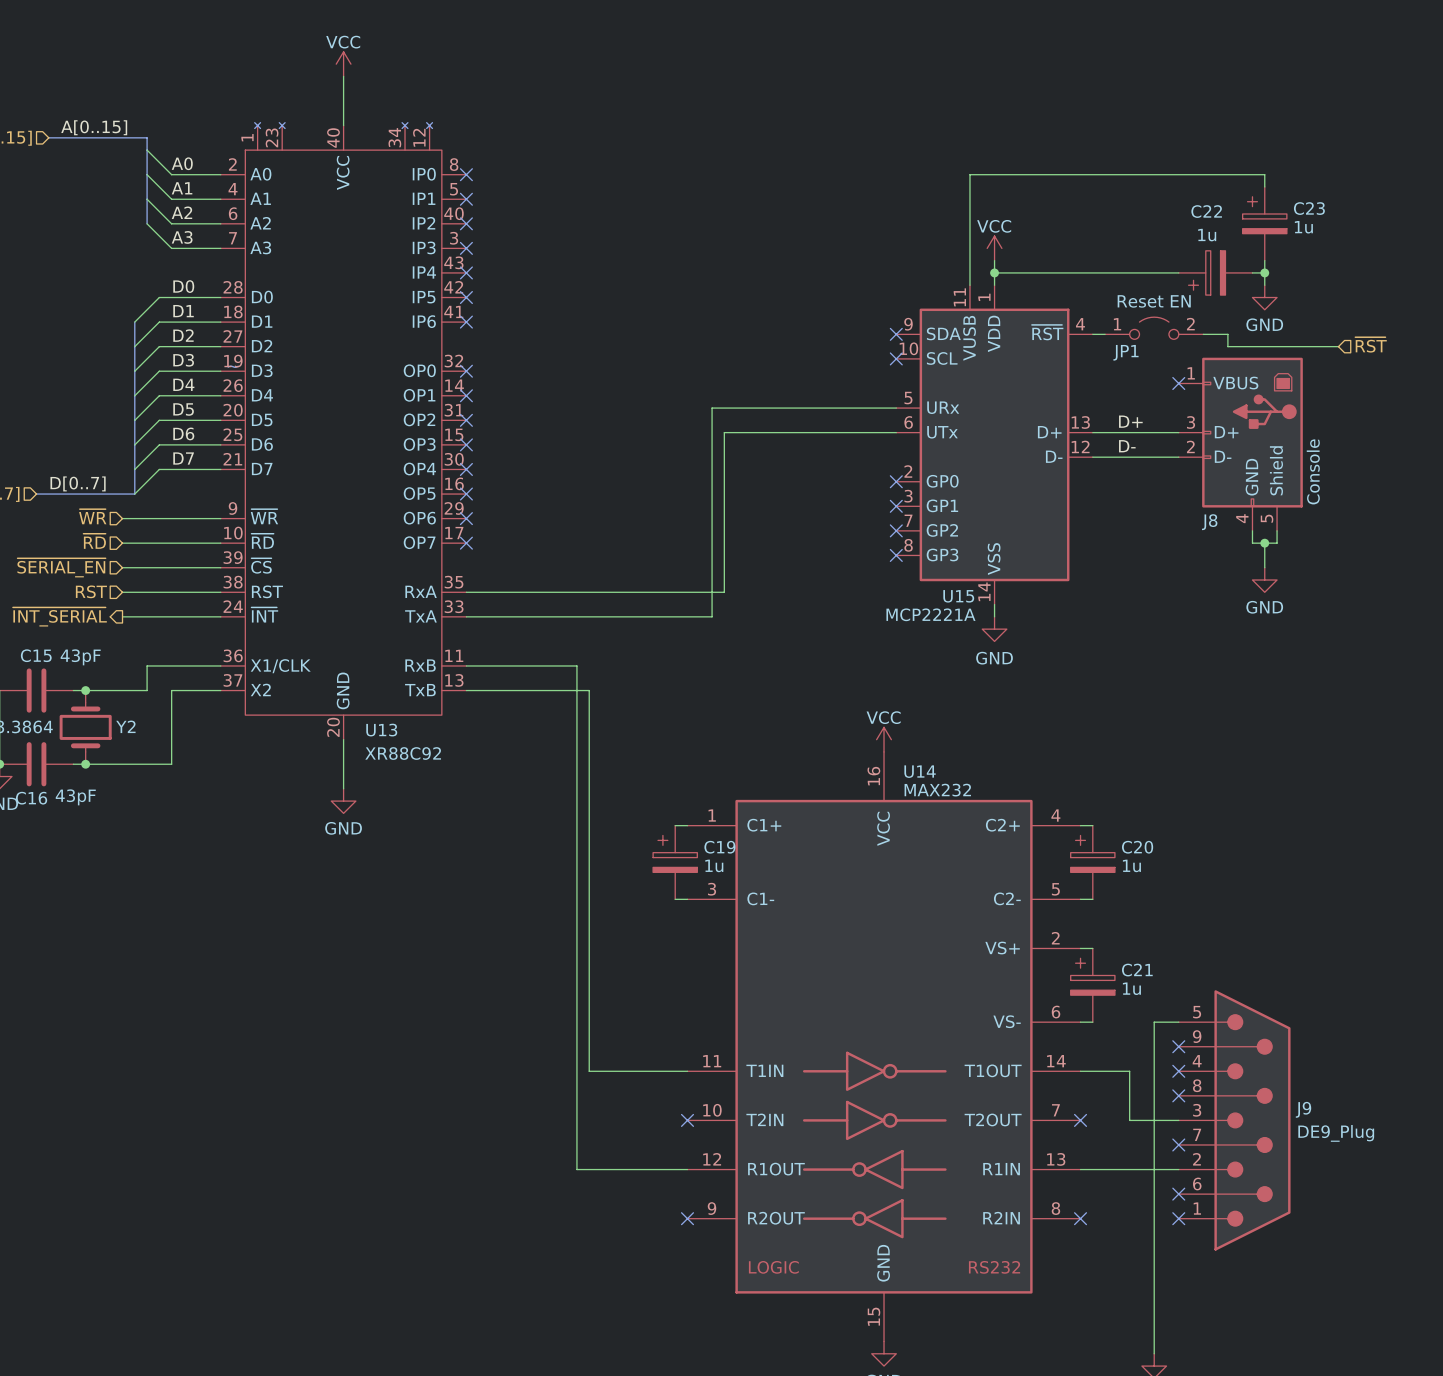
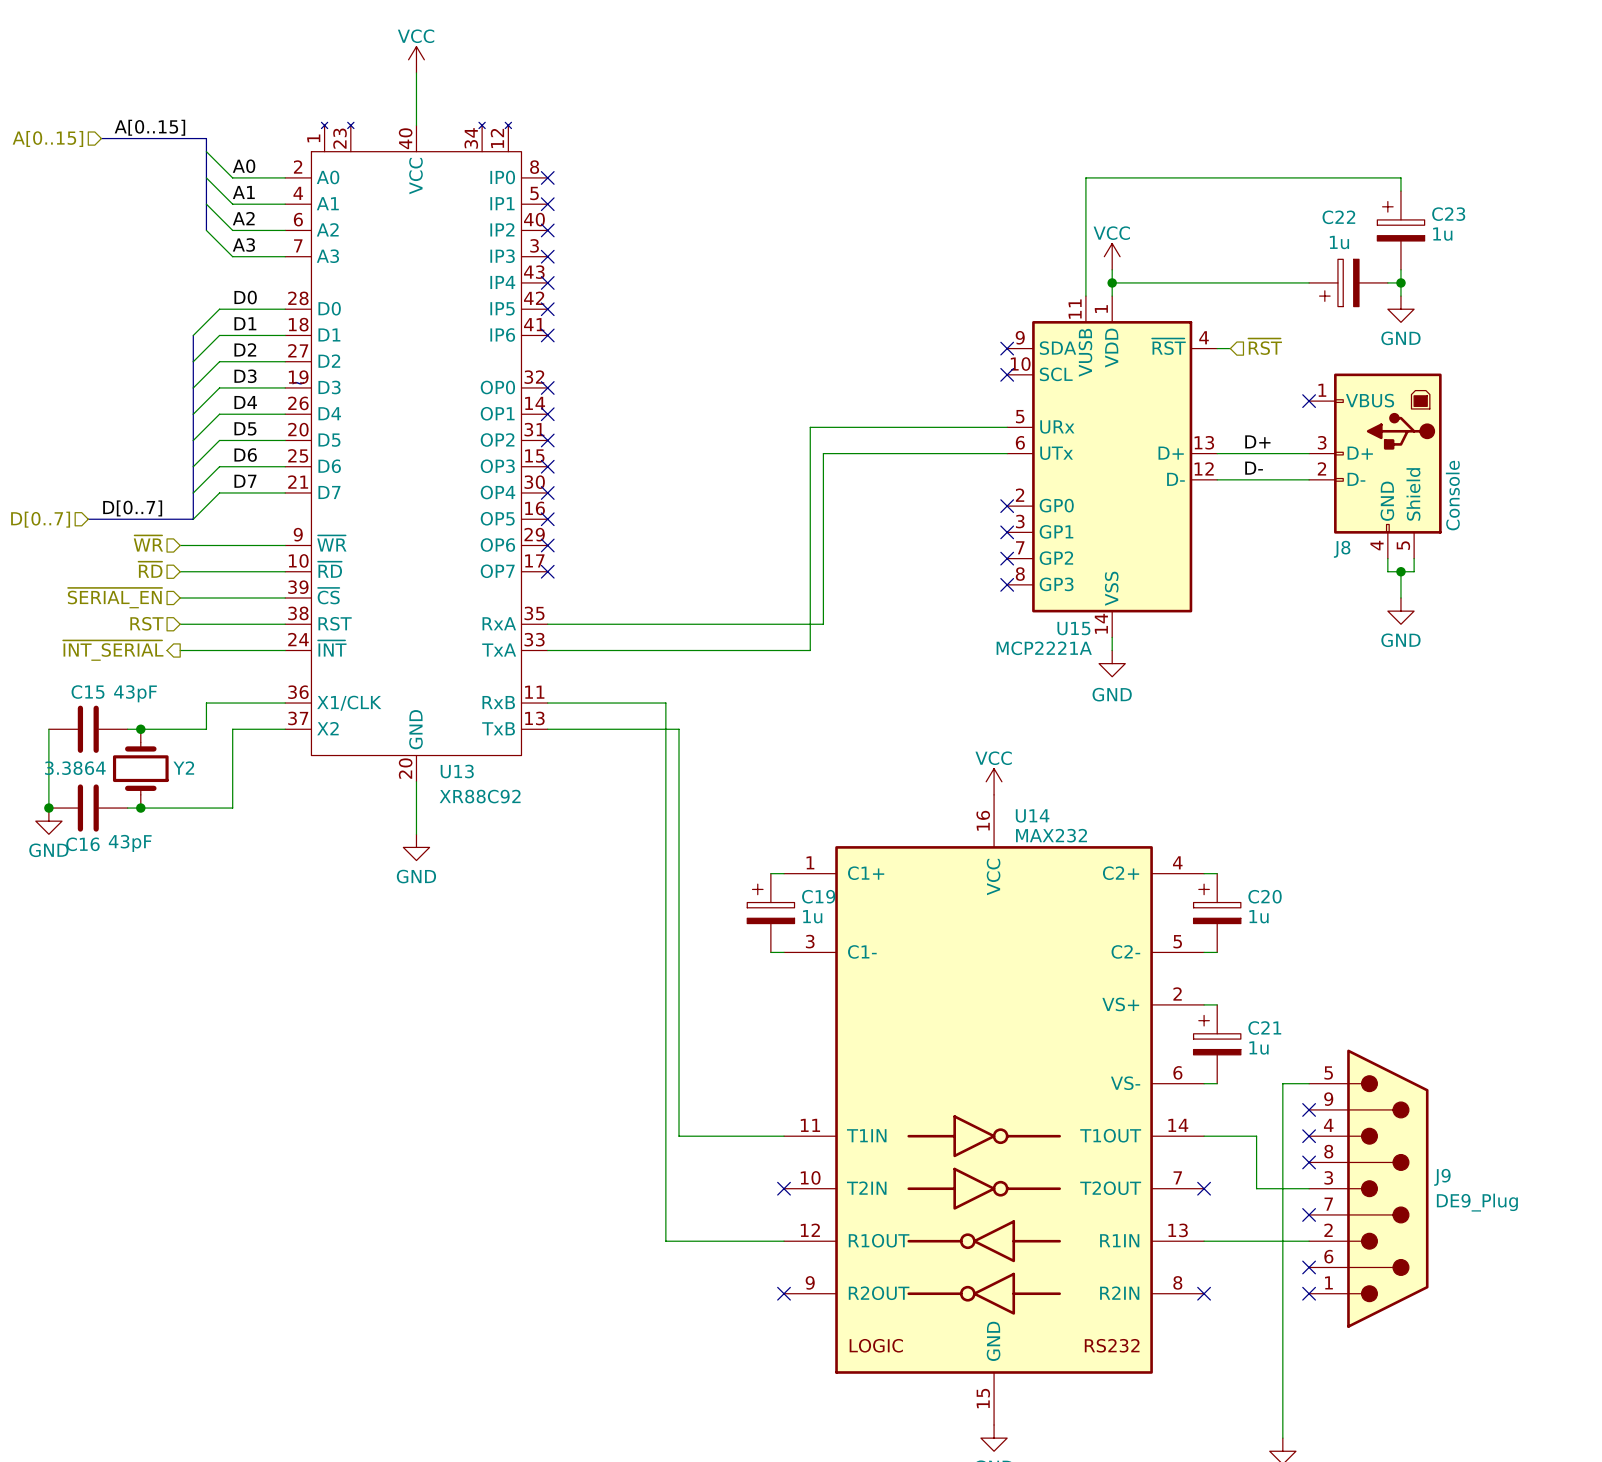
JP1: Reset EN (1154, 328) -> none
wire: (1203, 334) (1227, 334) (1227, 346) (1338, 346) -> none
hierarchical label position: ~{RST} (1371, 344) -> ~{RST} (1265, 346)

